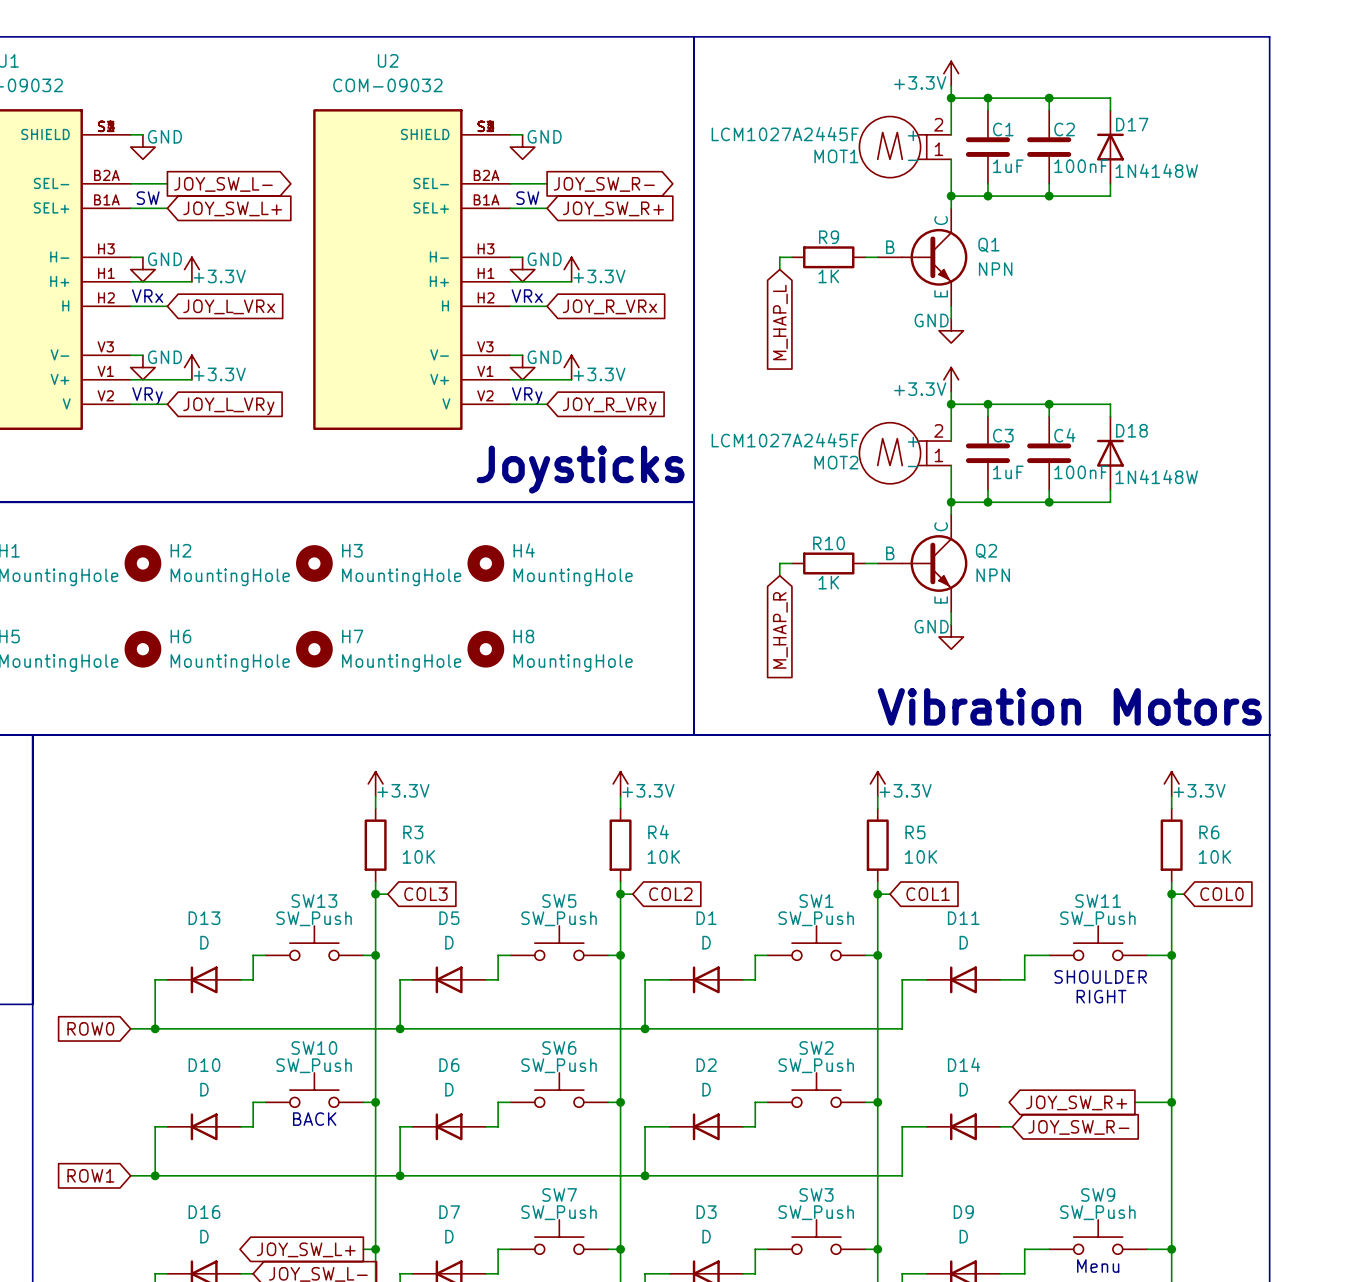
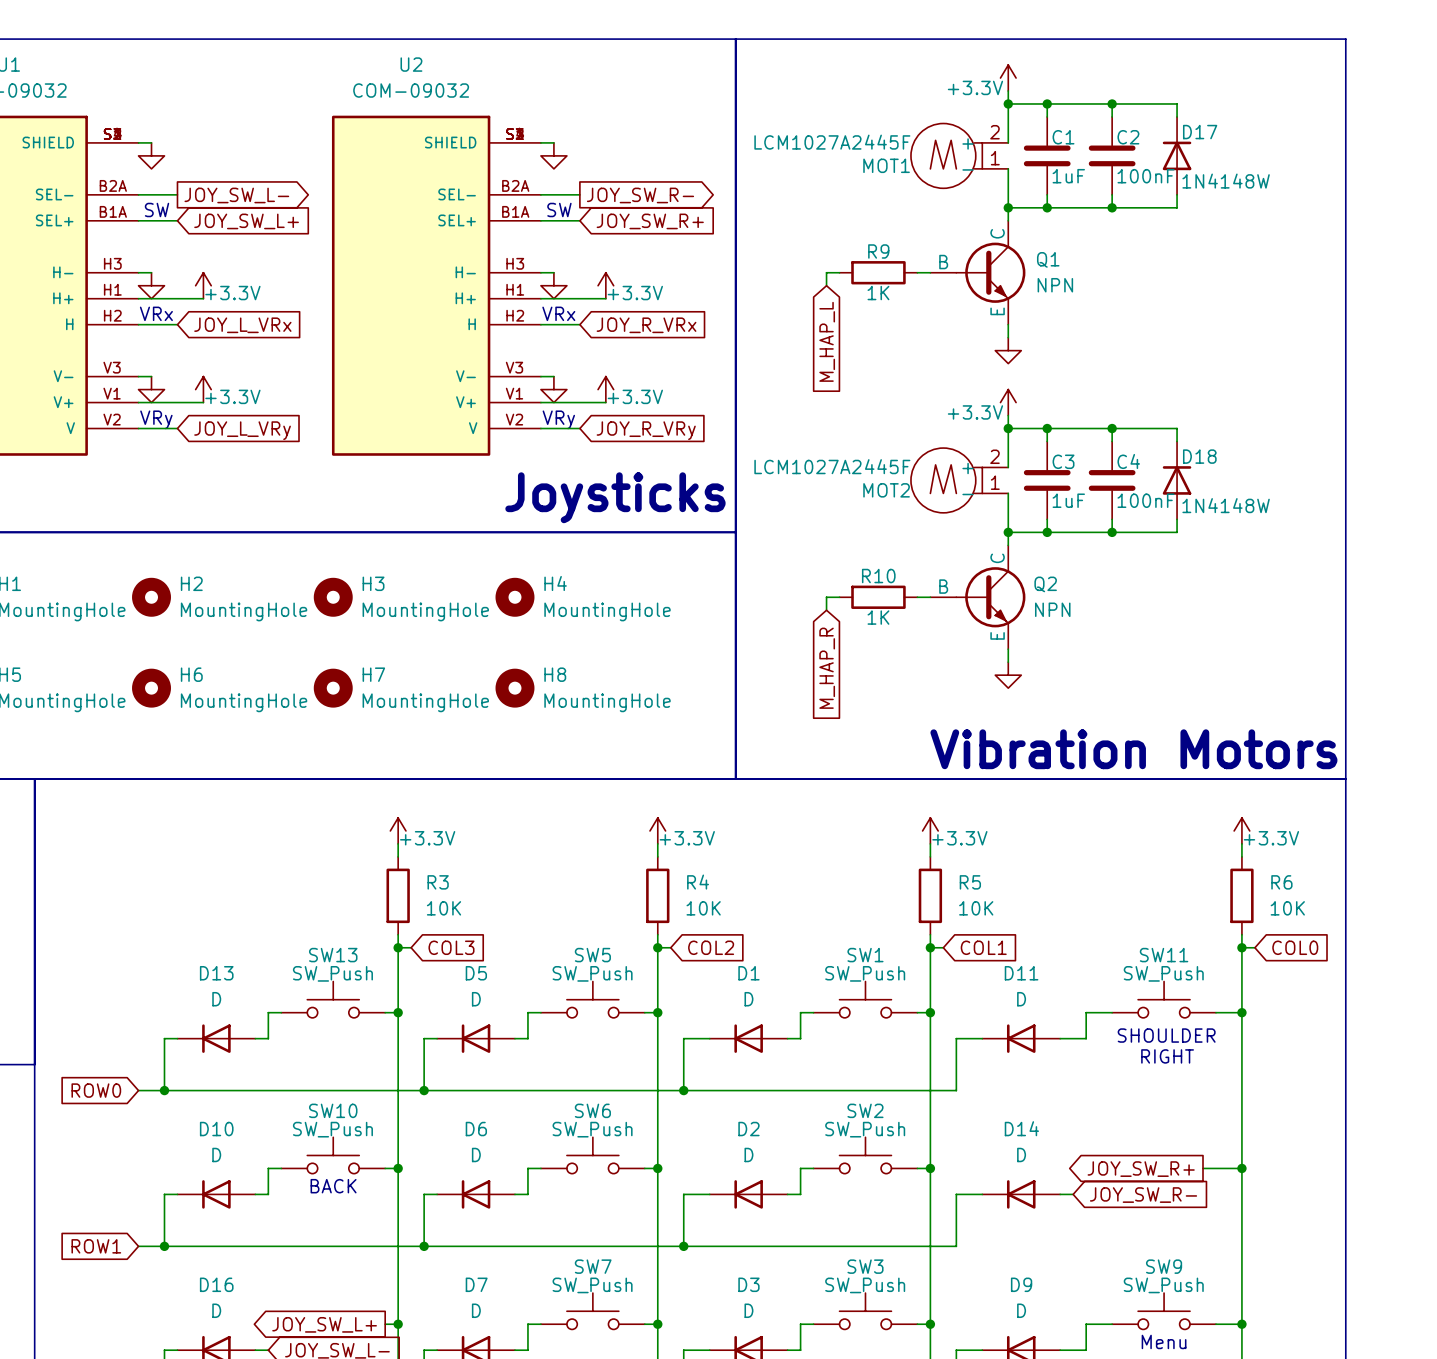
power symbol text: GND (164, 136) -> none
power symbol text: GND (544, 136) -> none
power symbol text: GND (164, 259) -> none
power symbol text: GND (544, 259) -> none
power symbol text: GND (931, 320) -> none
power symbol text: GND (164, 357) -> none
power symbol text: GND (544, 357) -> none
power symbol text: GND (931, 626) -> none

